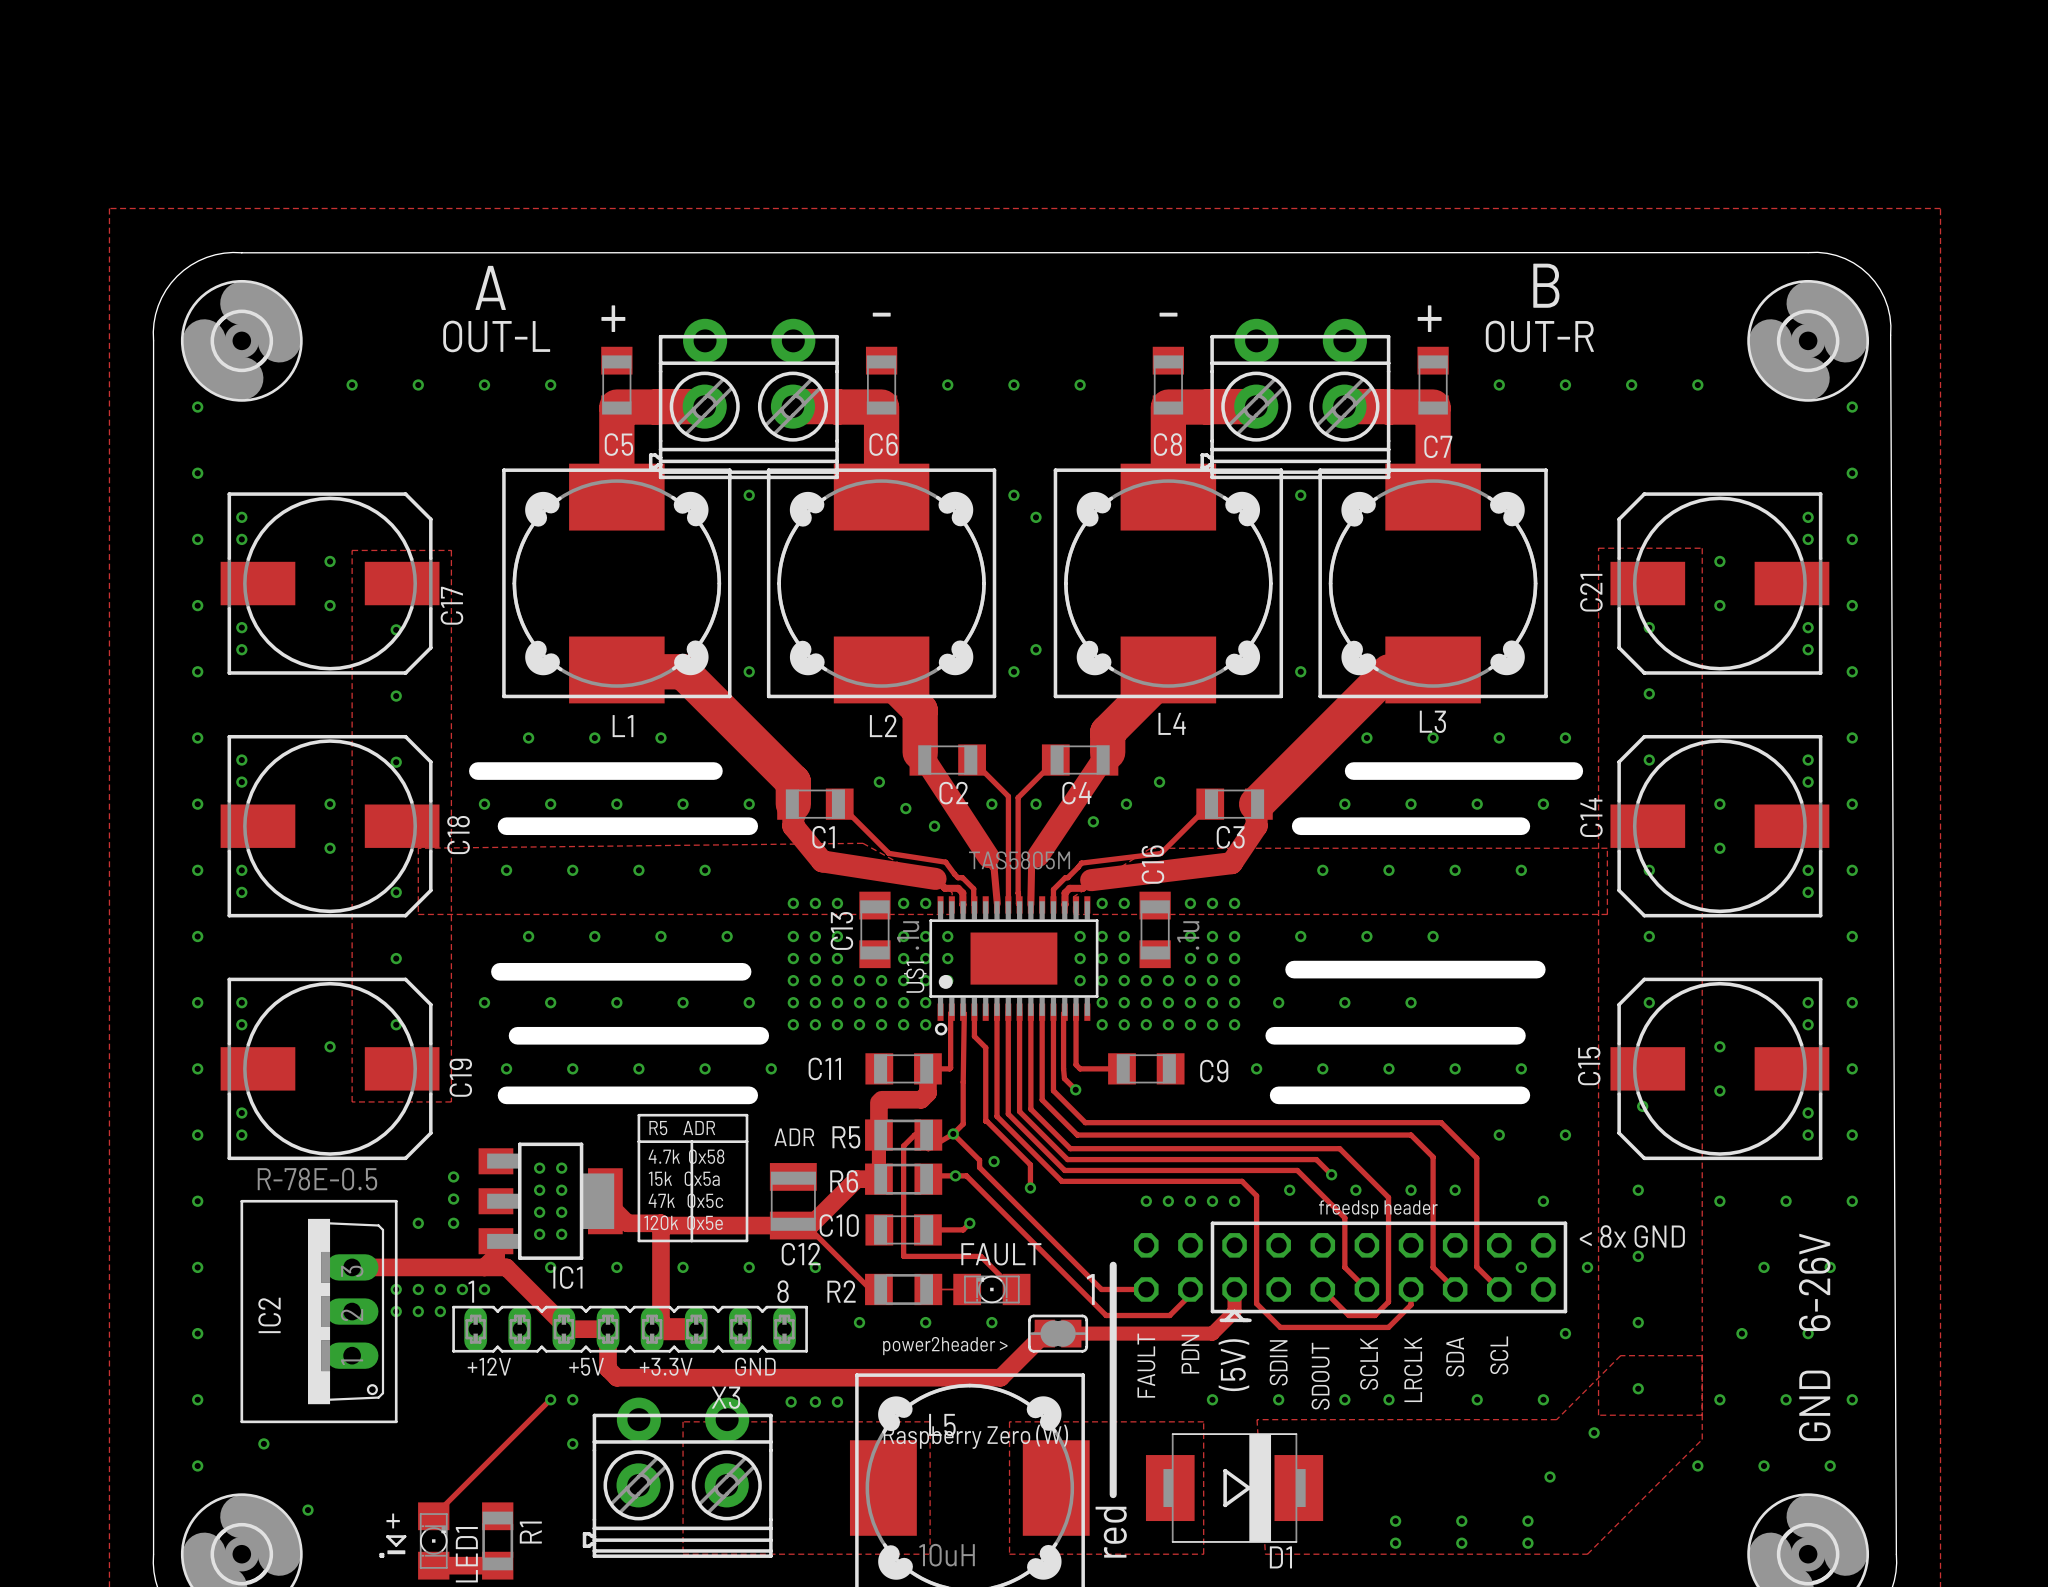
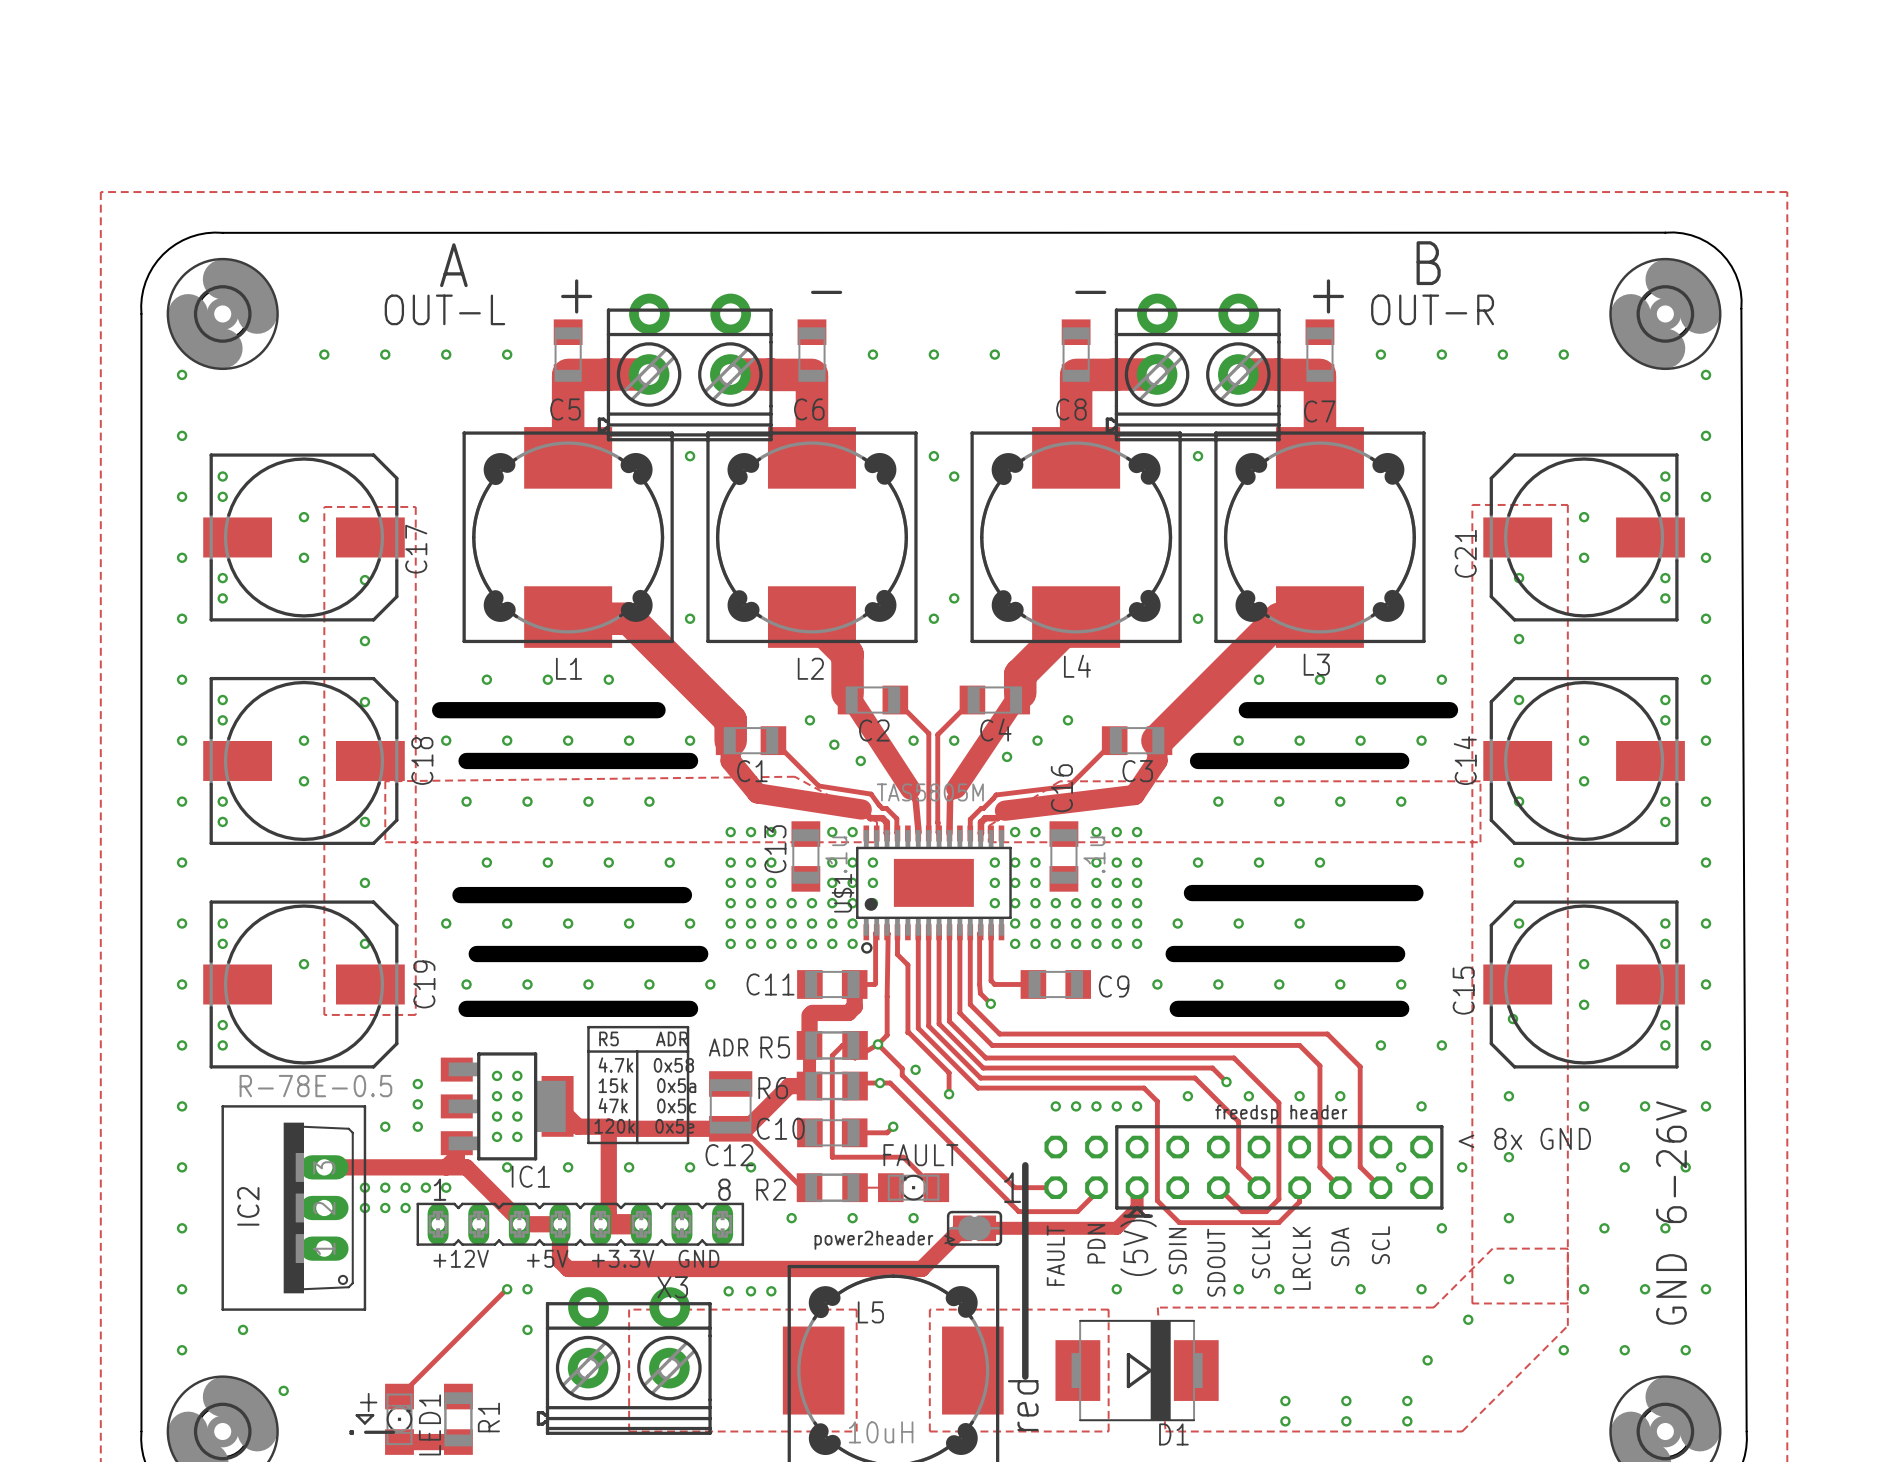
text: Raspberry Zero (W) (975, 1436) -> none

